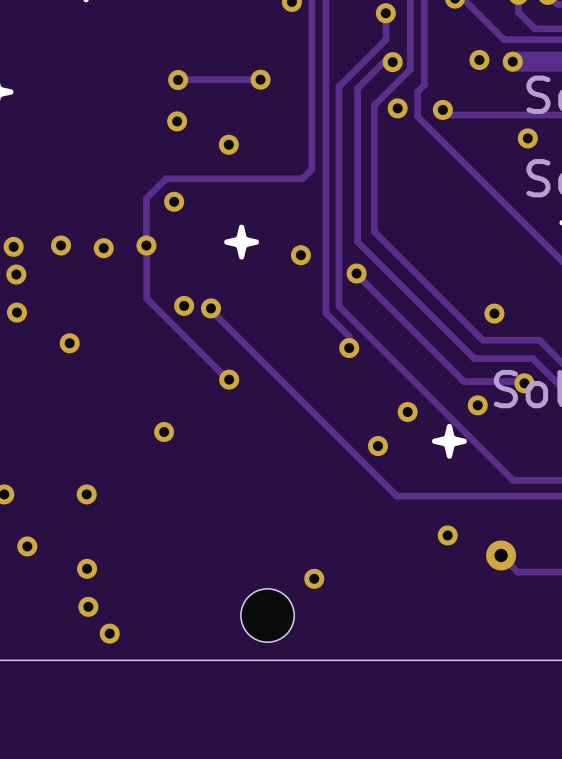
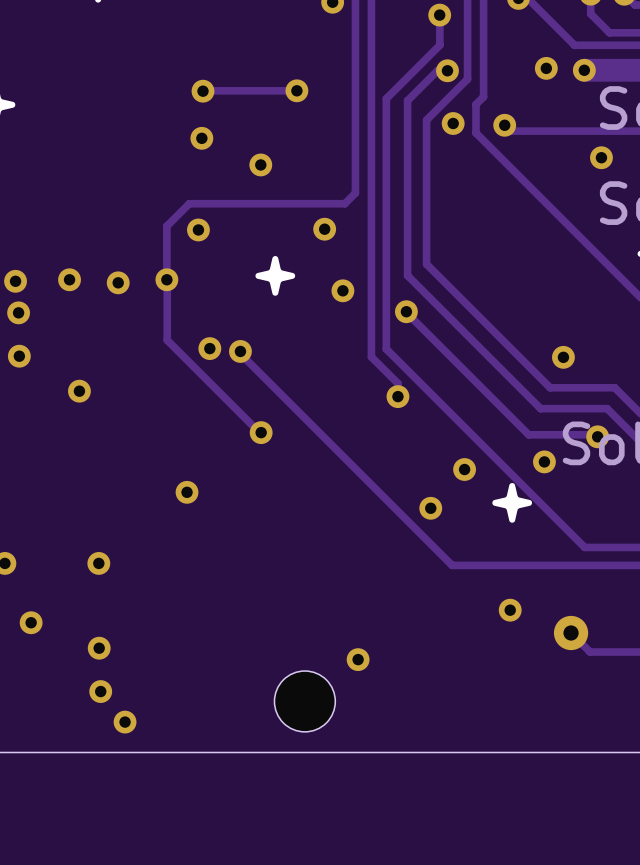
via: none -> (324, 229)

